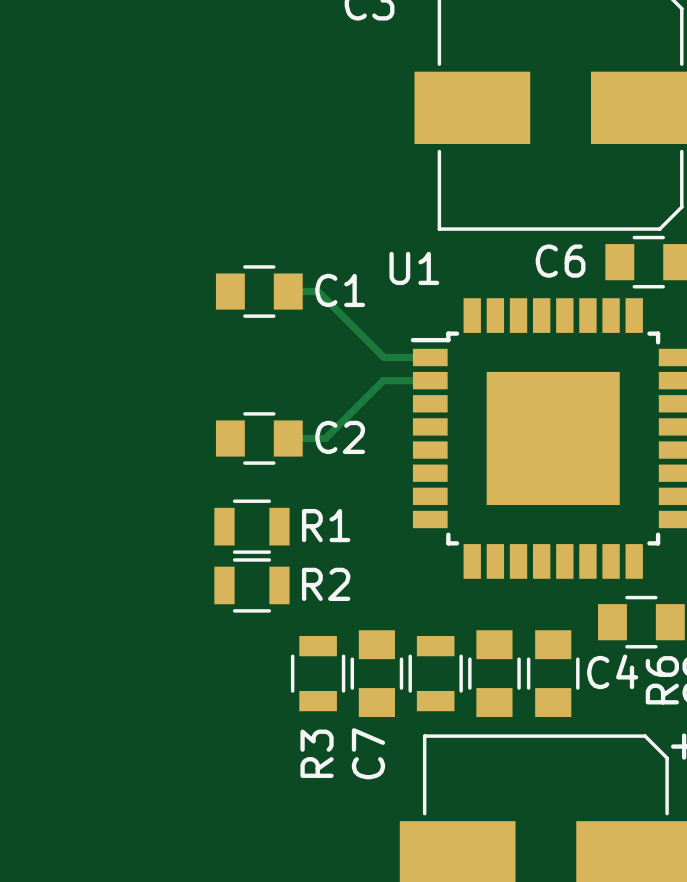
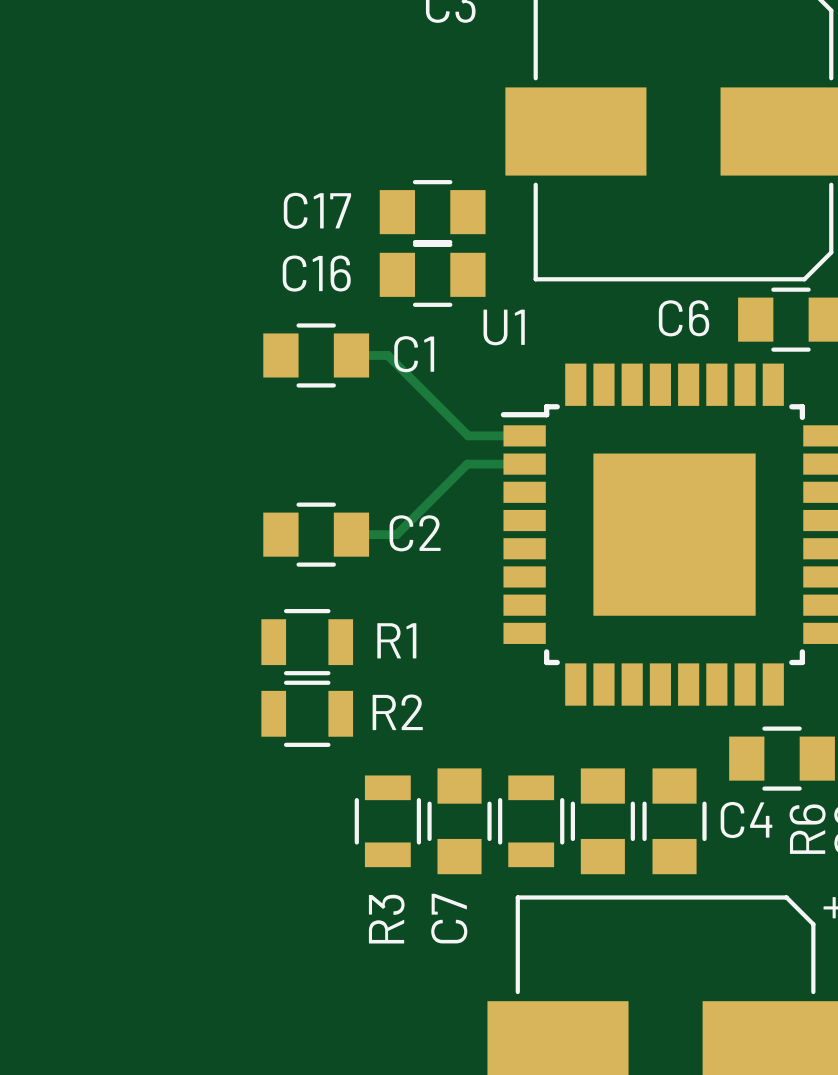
C17: none -> (432, 212)
C16: none -> (432, 274)

